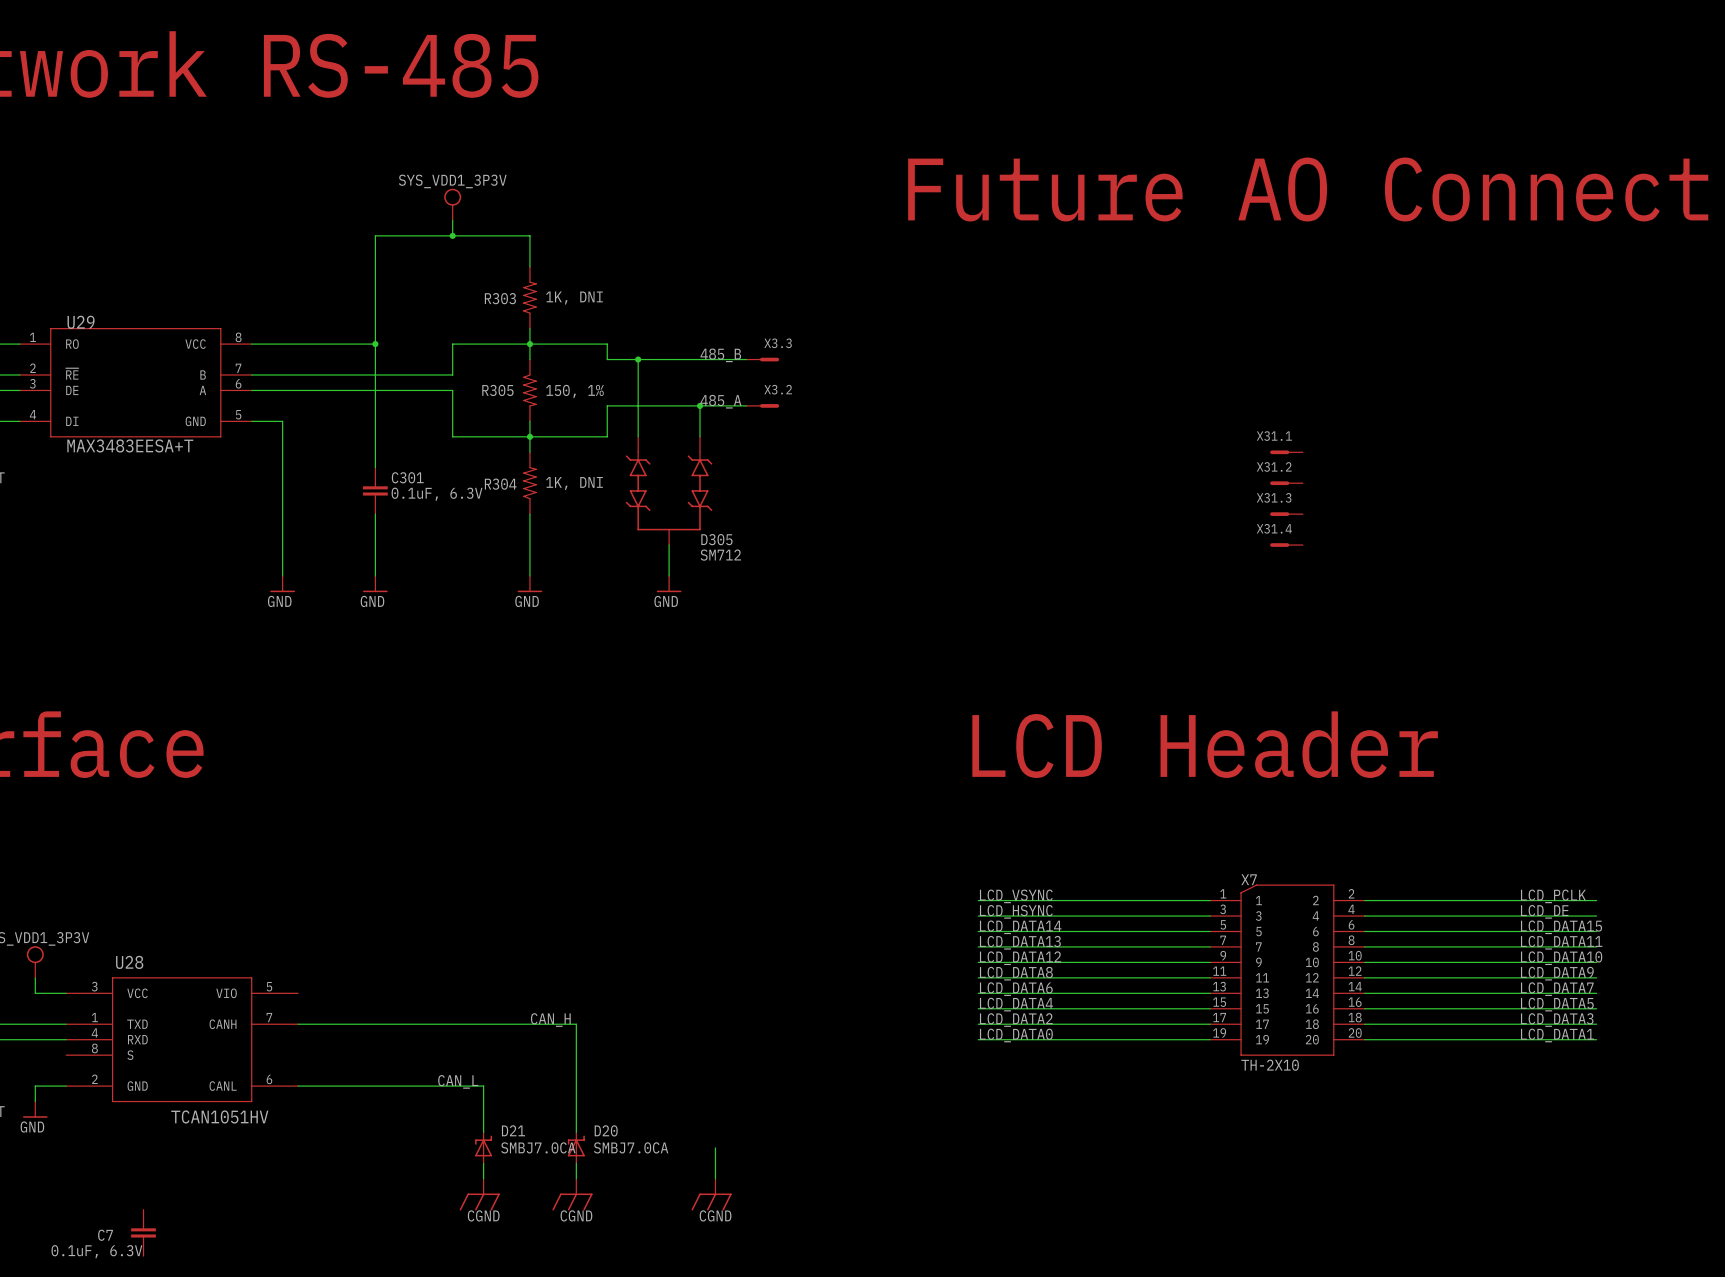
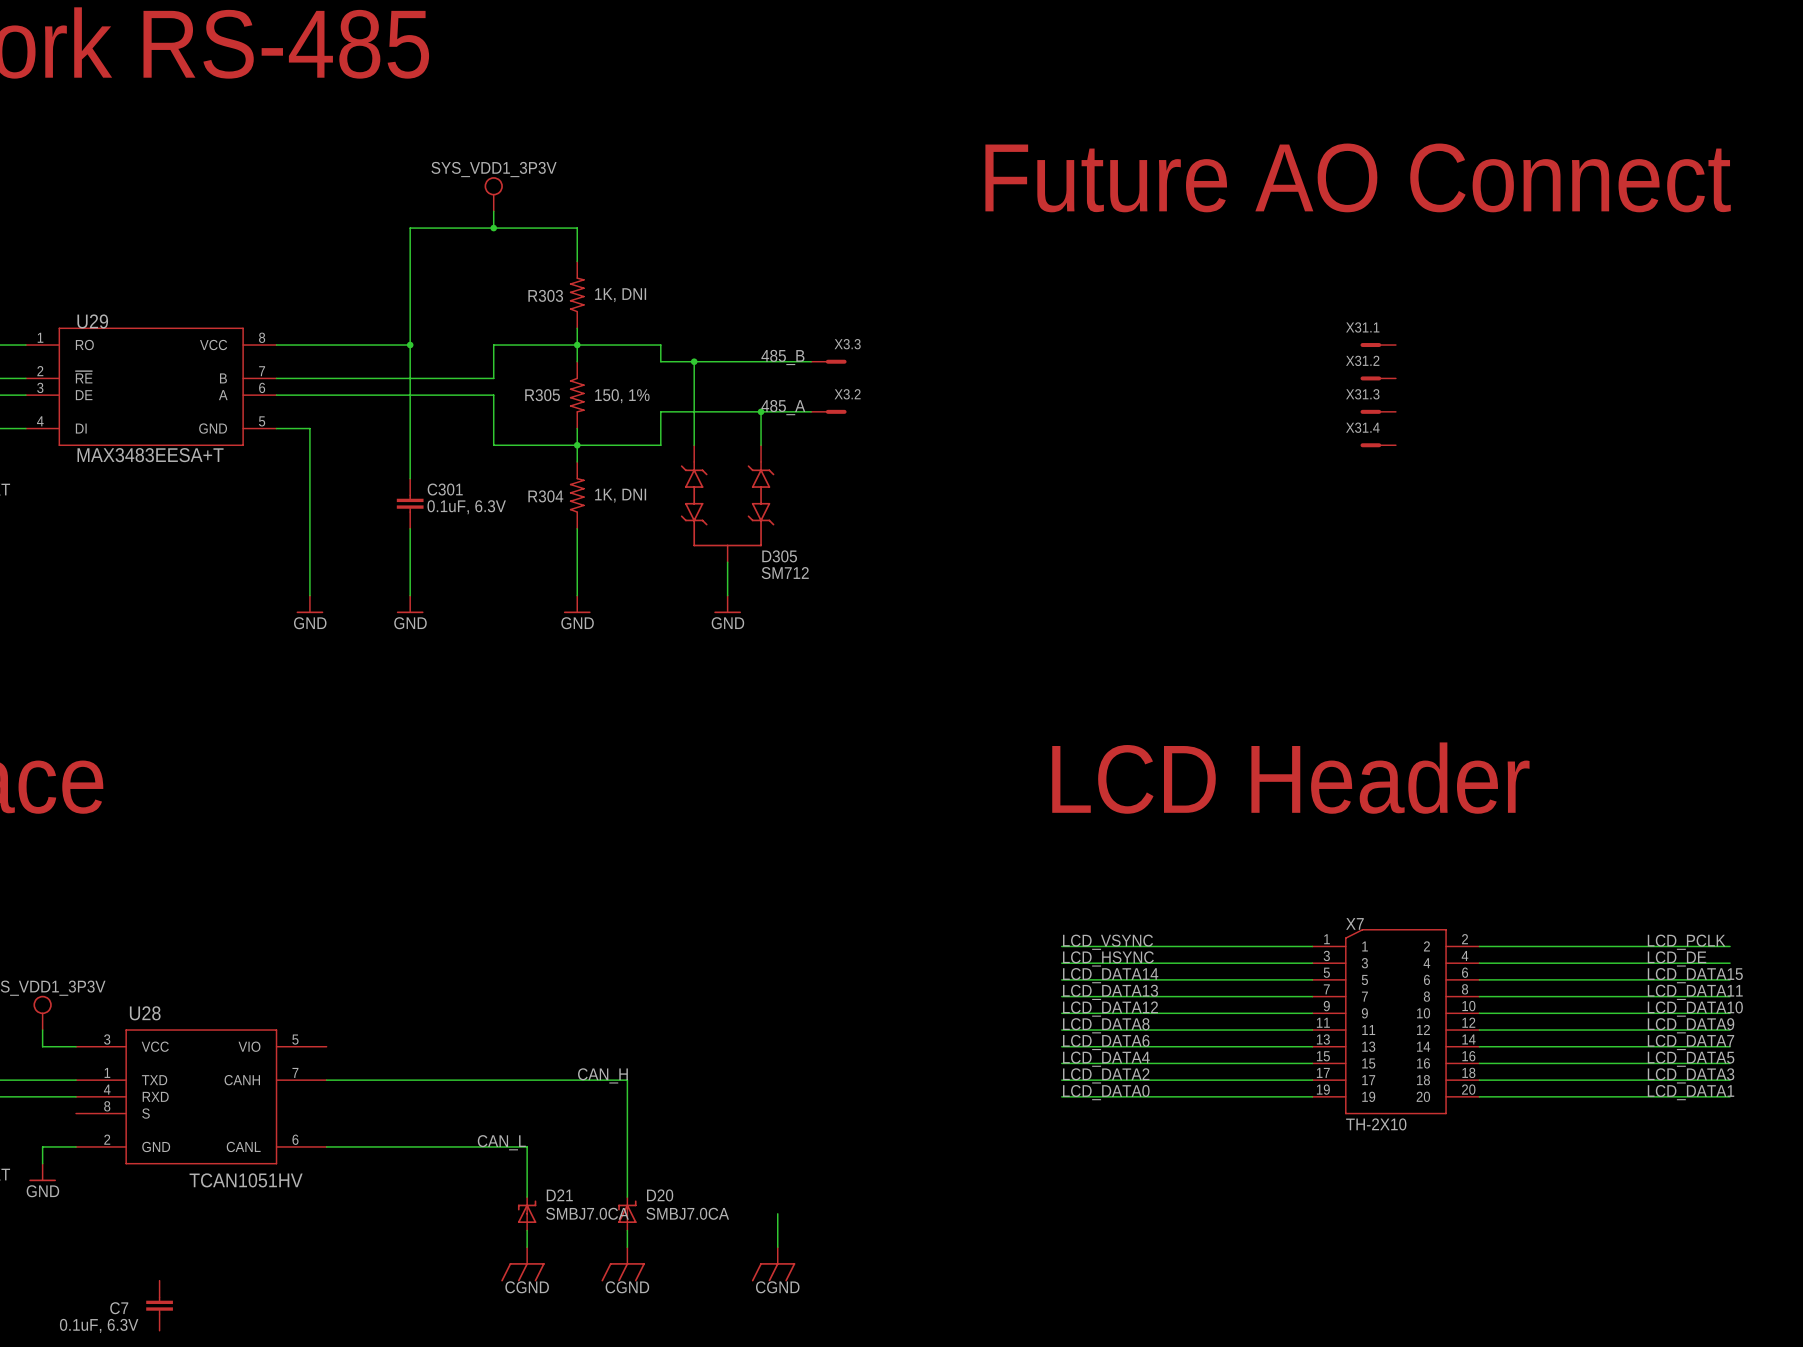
X31.1 position: (1286, 452) -> (1378, 345)
X31.2 position: (1286, 483) -> (1378, 378)
X31.3 position: (1286, 514) -> (1378, 411)
X31.4 position: (1286, 545) -> (1378, 445)

